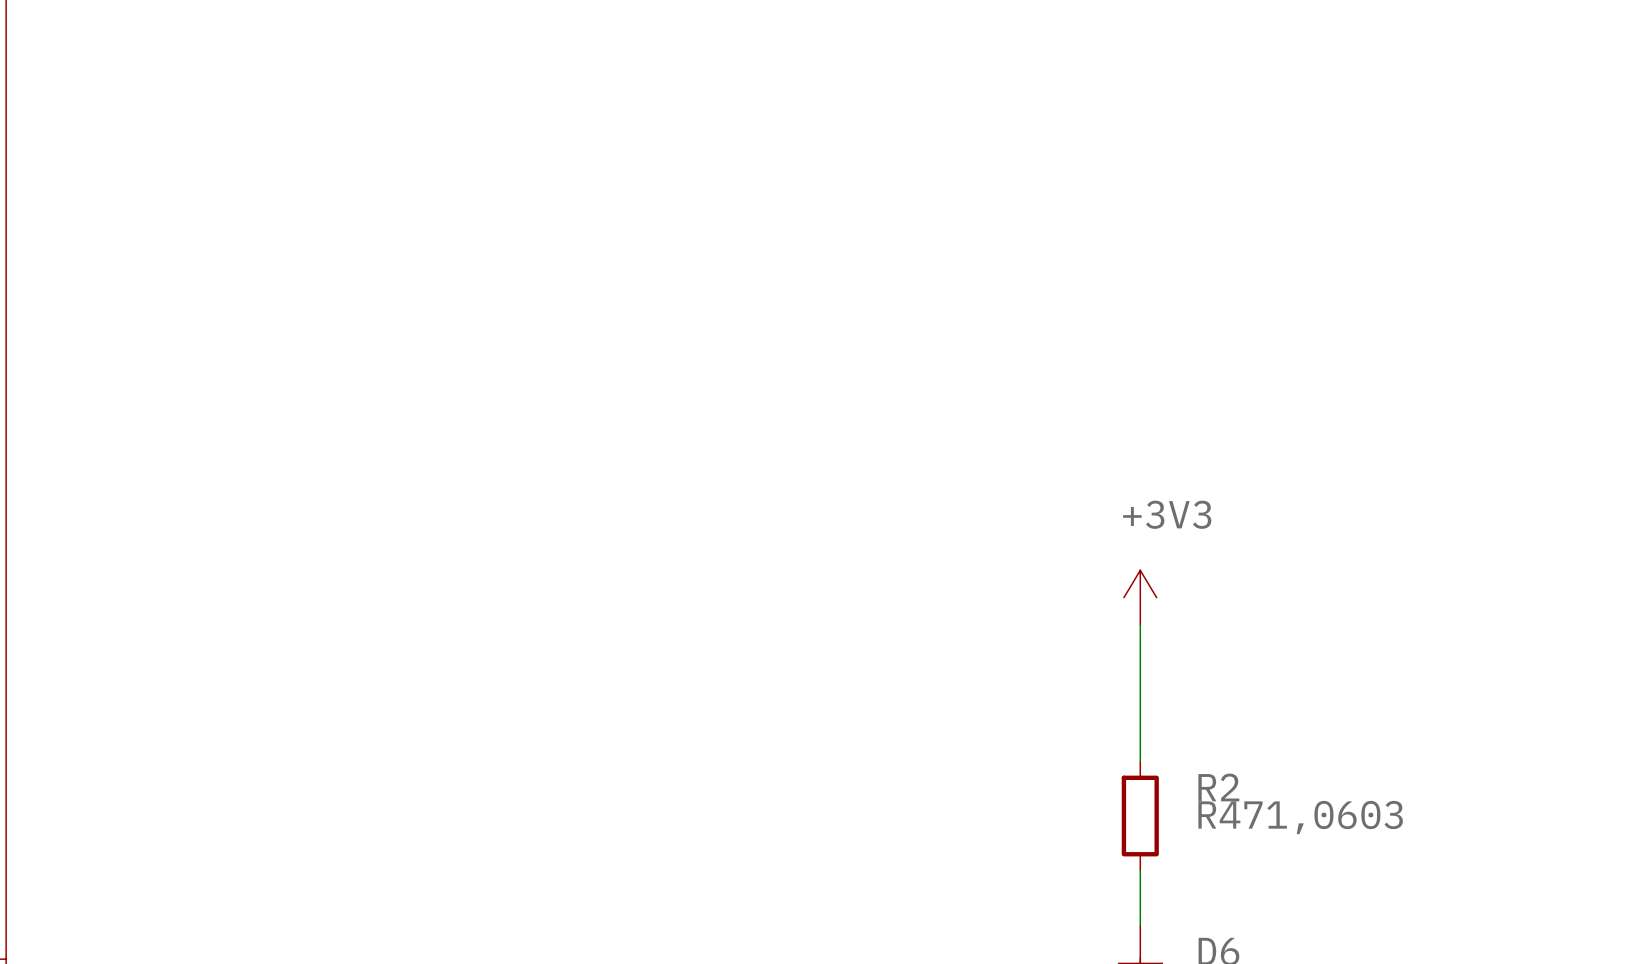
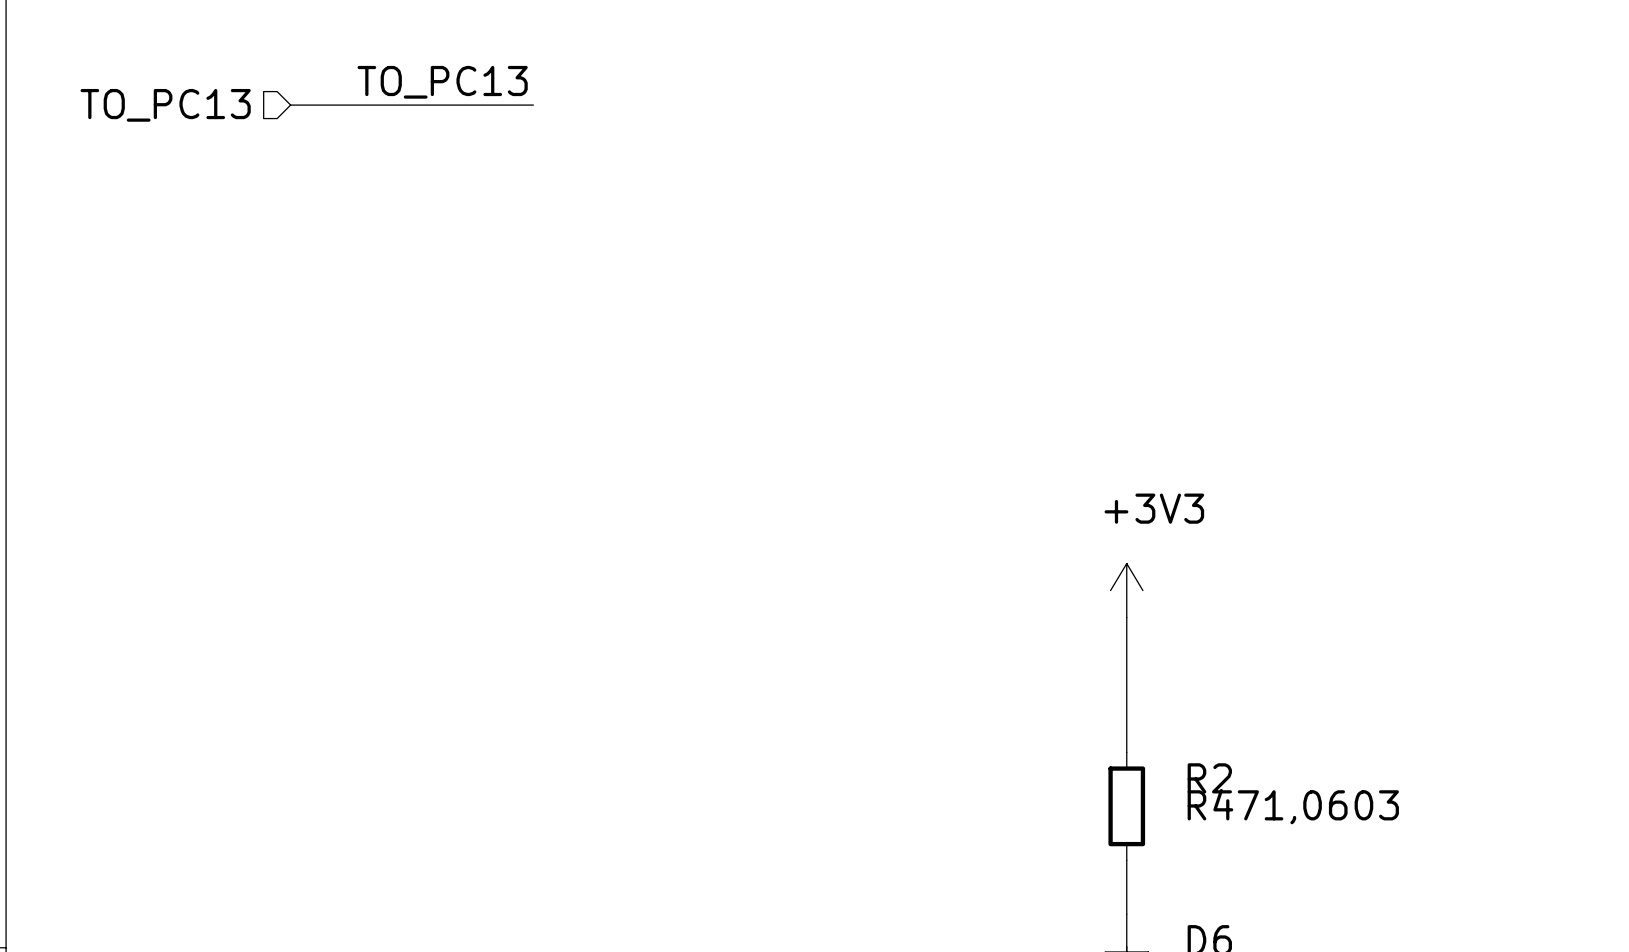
label: none -> TO_PC13 (442, 82)
wire: none -> (290, 105) (533, 105)
hierarchical label: none -> TO_PC13 (165, 105)

